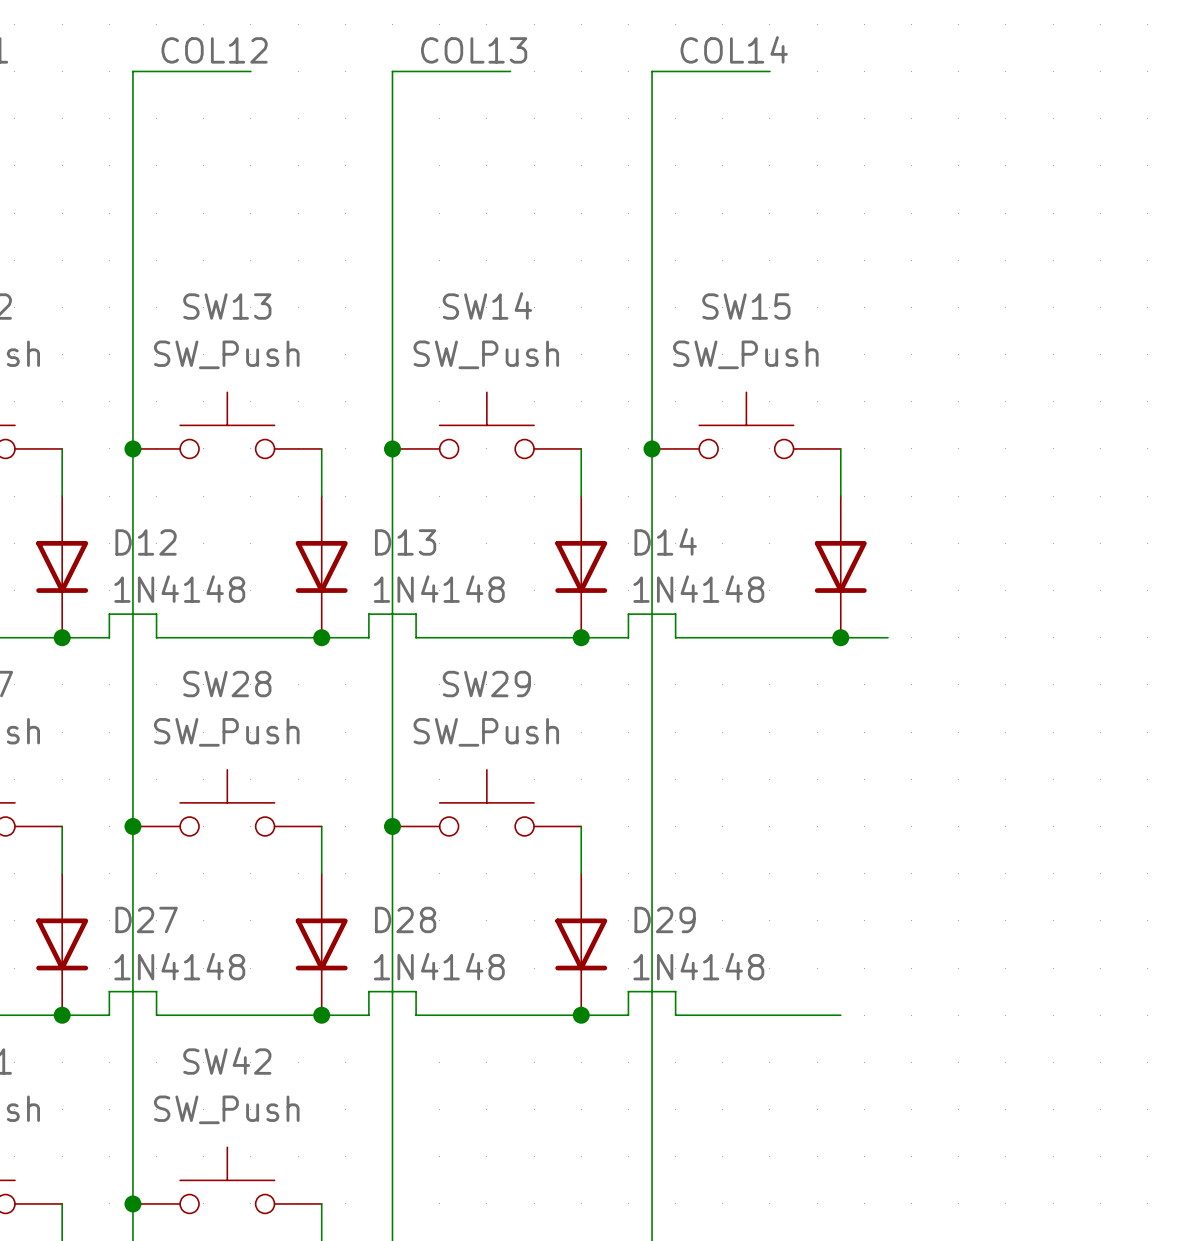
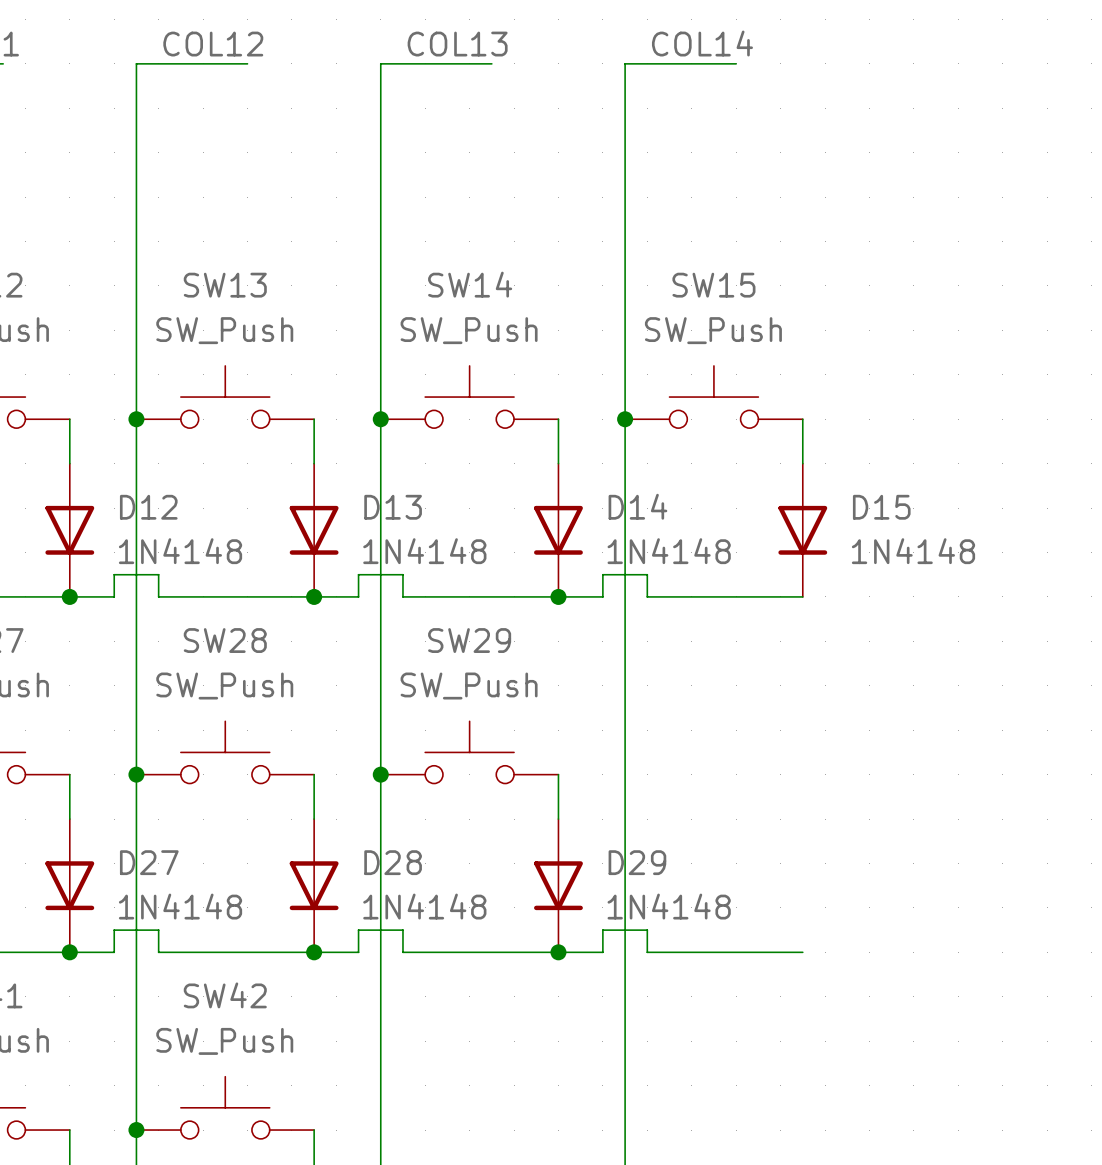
D15 name: none -> D15 (881, 507)
D15 value: none -> 1N4148 (913, 551)
wire: (840, 637) (887, 637) -> none
junction: (840, 637) -> none

